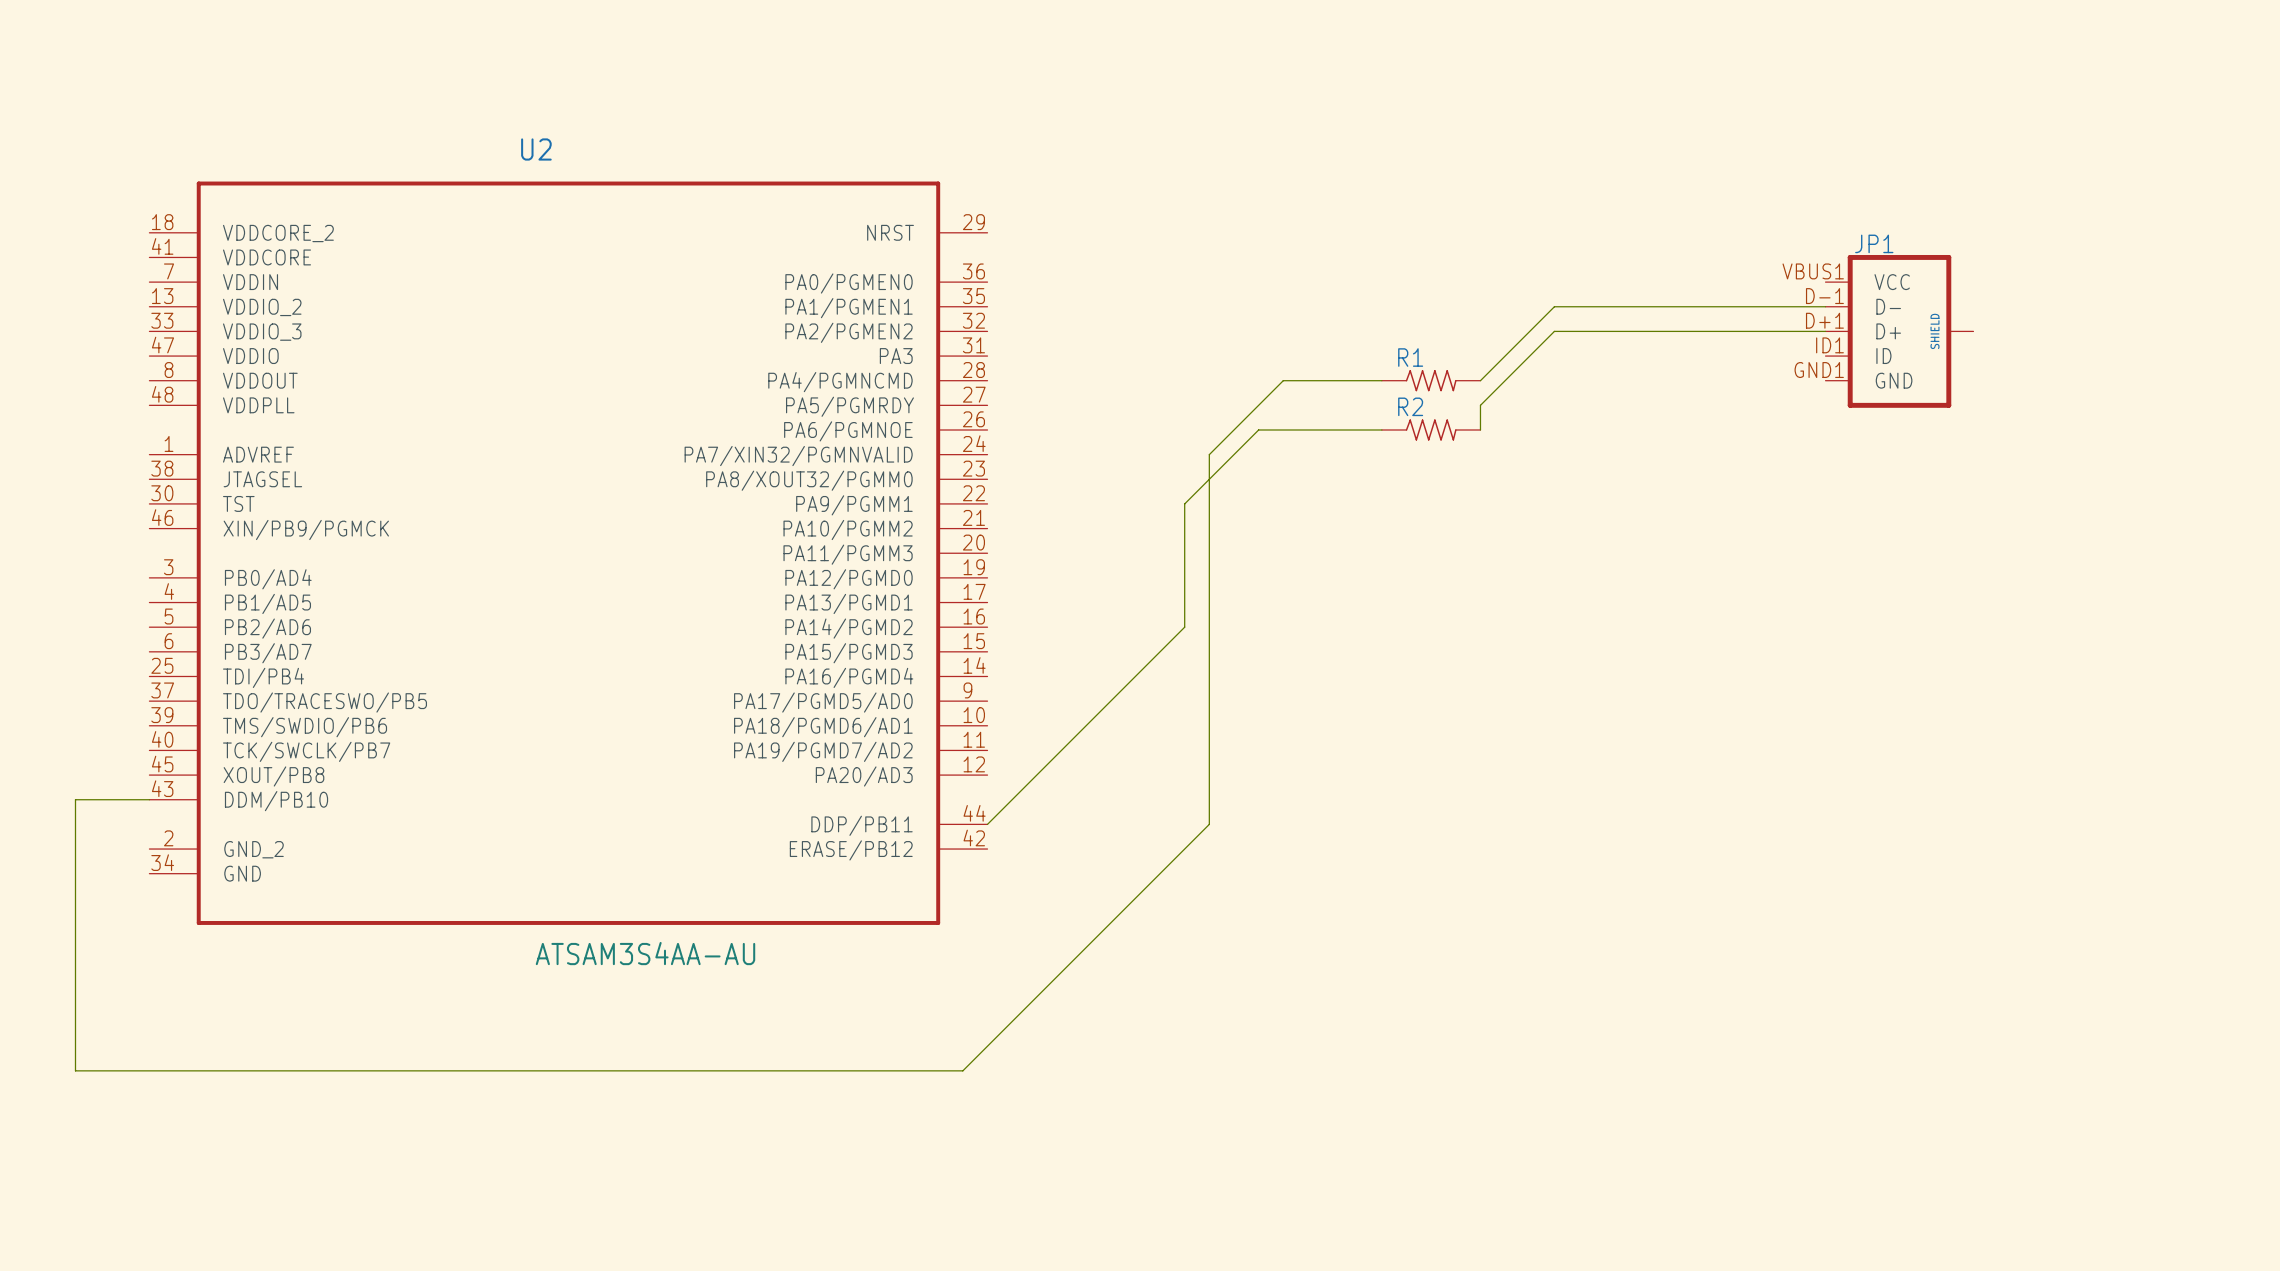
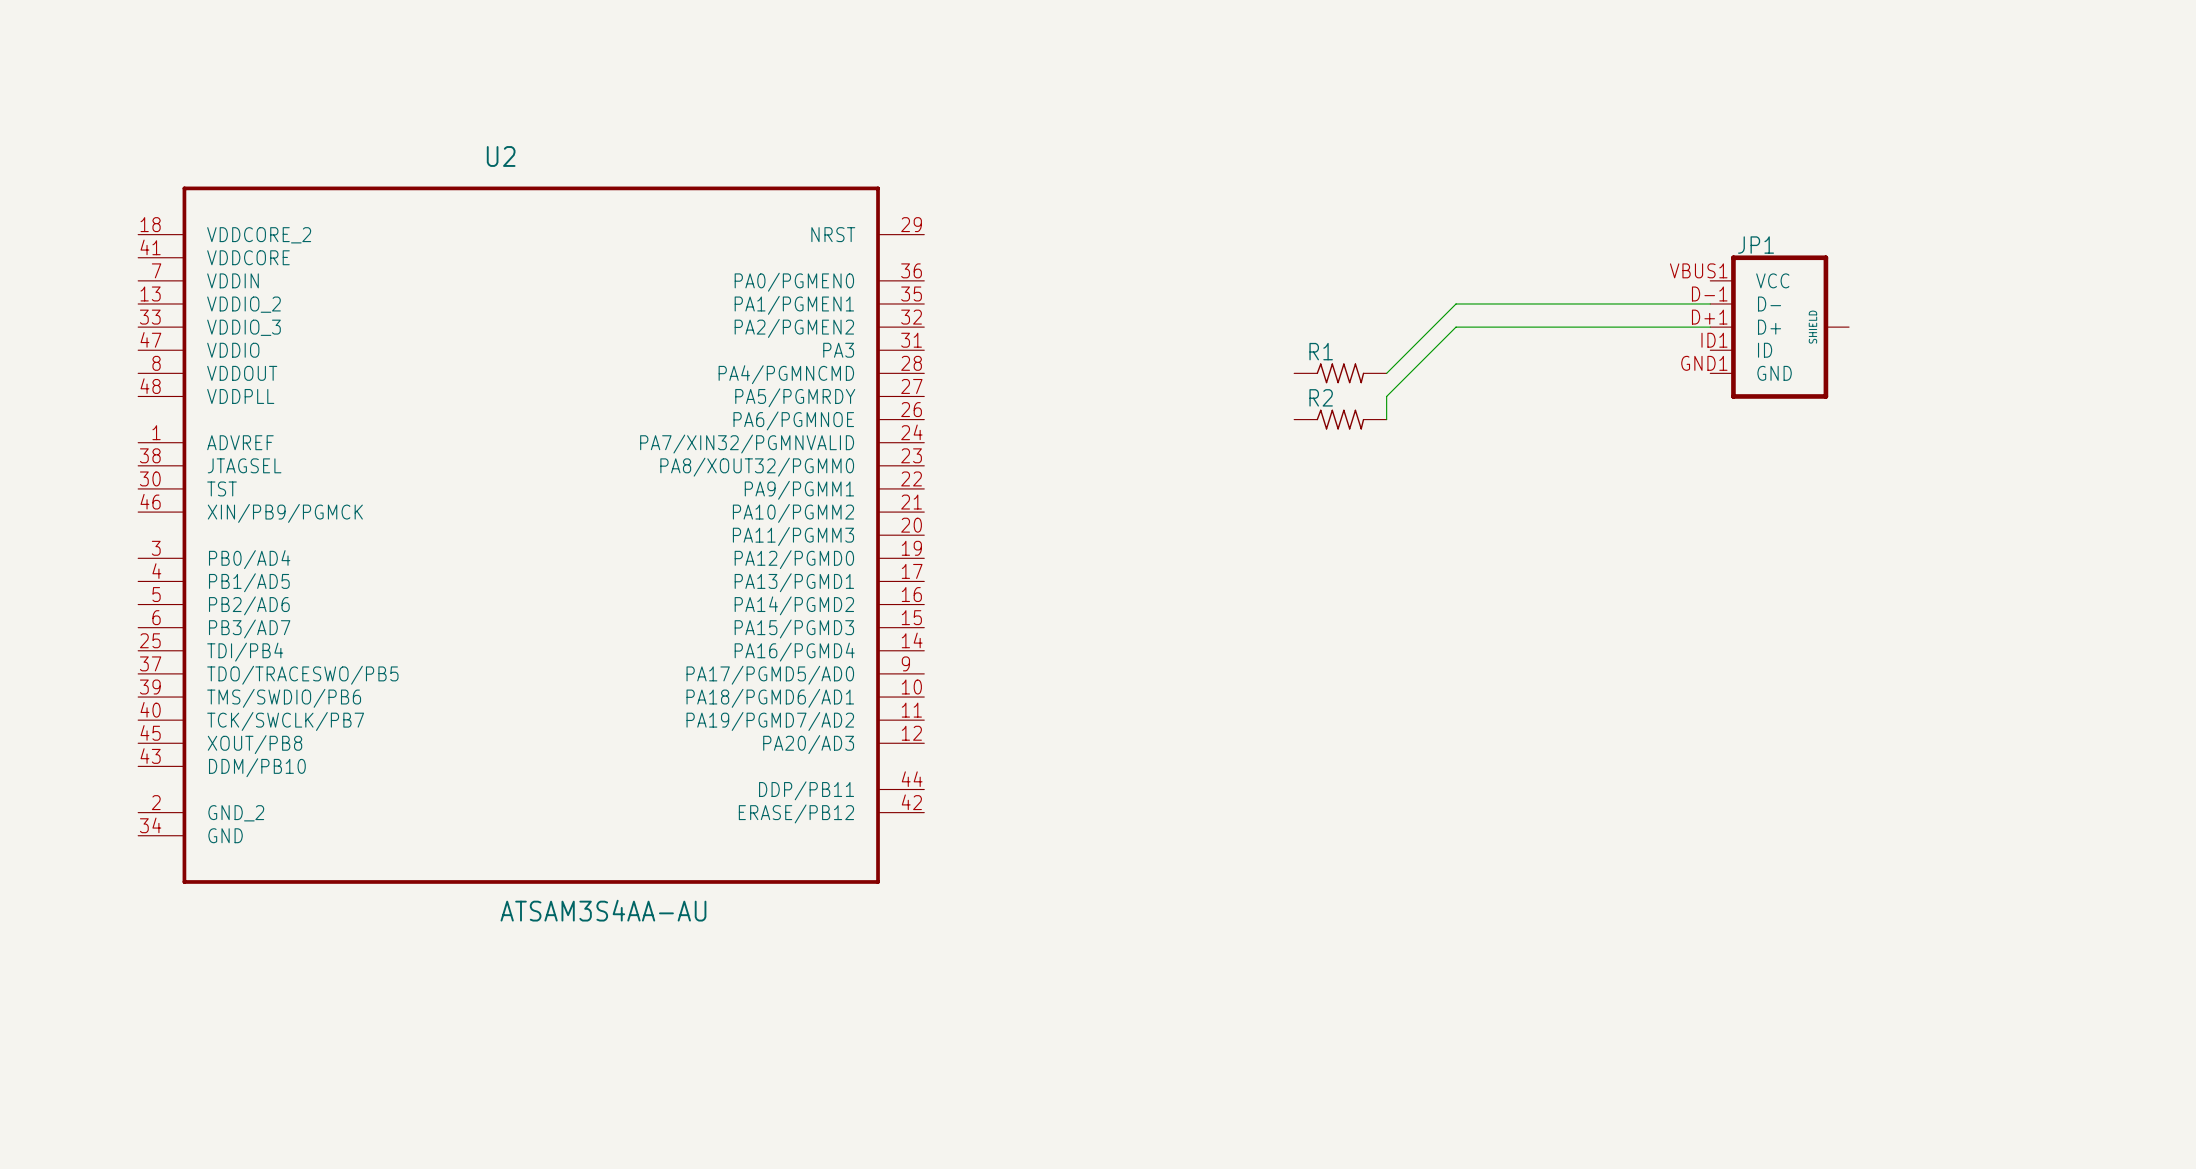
wire: (1381, 380) (1283, 380) (1209, 454) (1209, 824) (962, 1070) (75, 1070) (75, 799) (149, 799) -> none
wire: (1381, 429) (1258, 429) (1184, 503) (1184, 627) (987, 824) -> none

